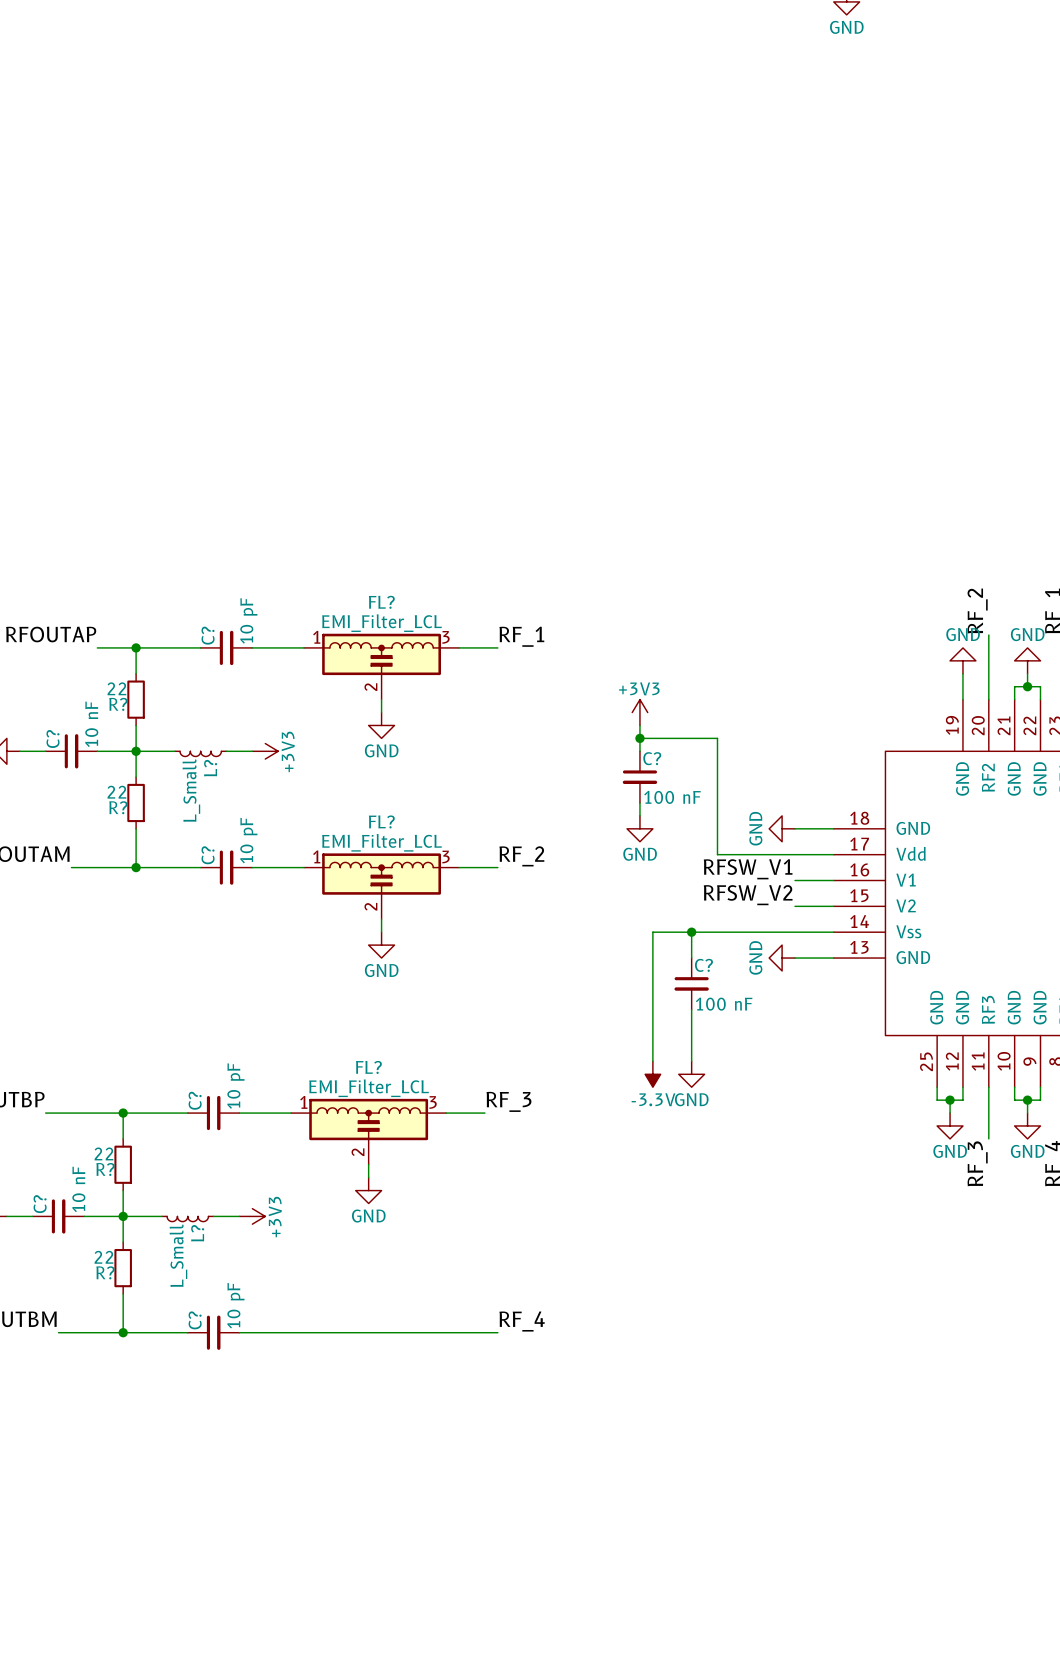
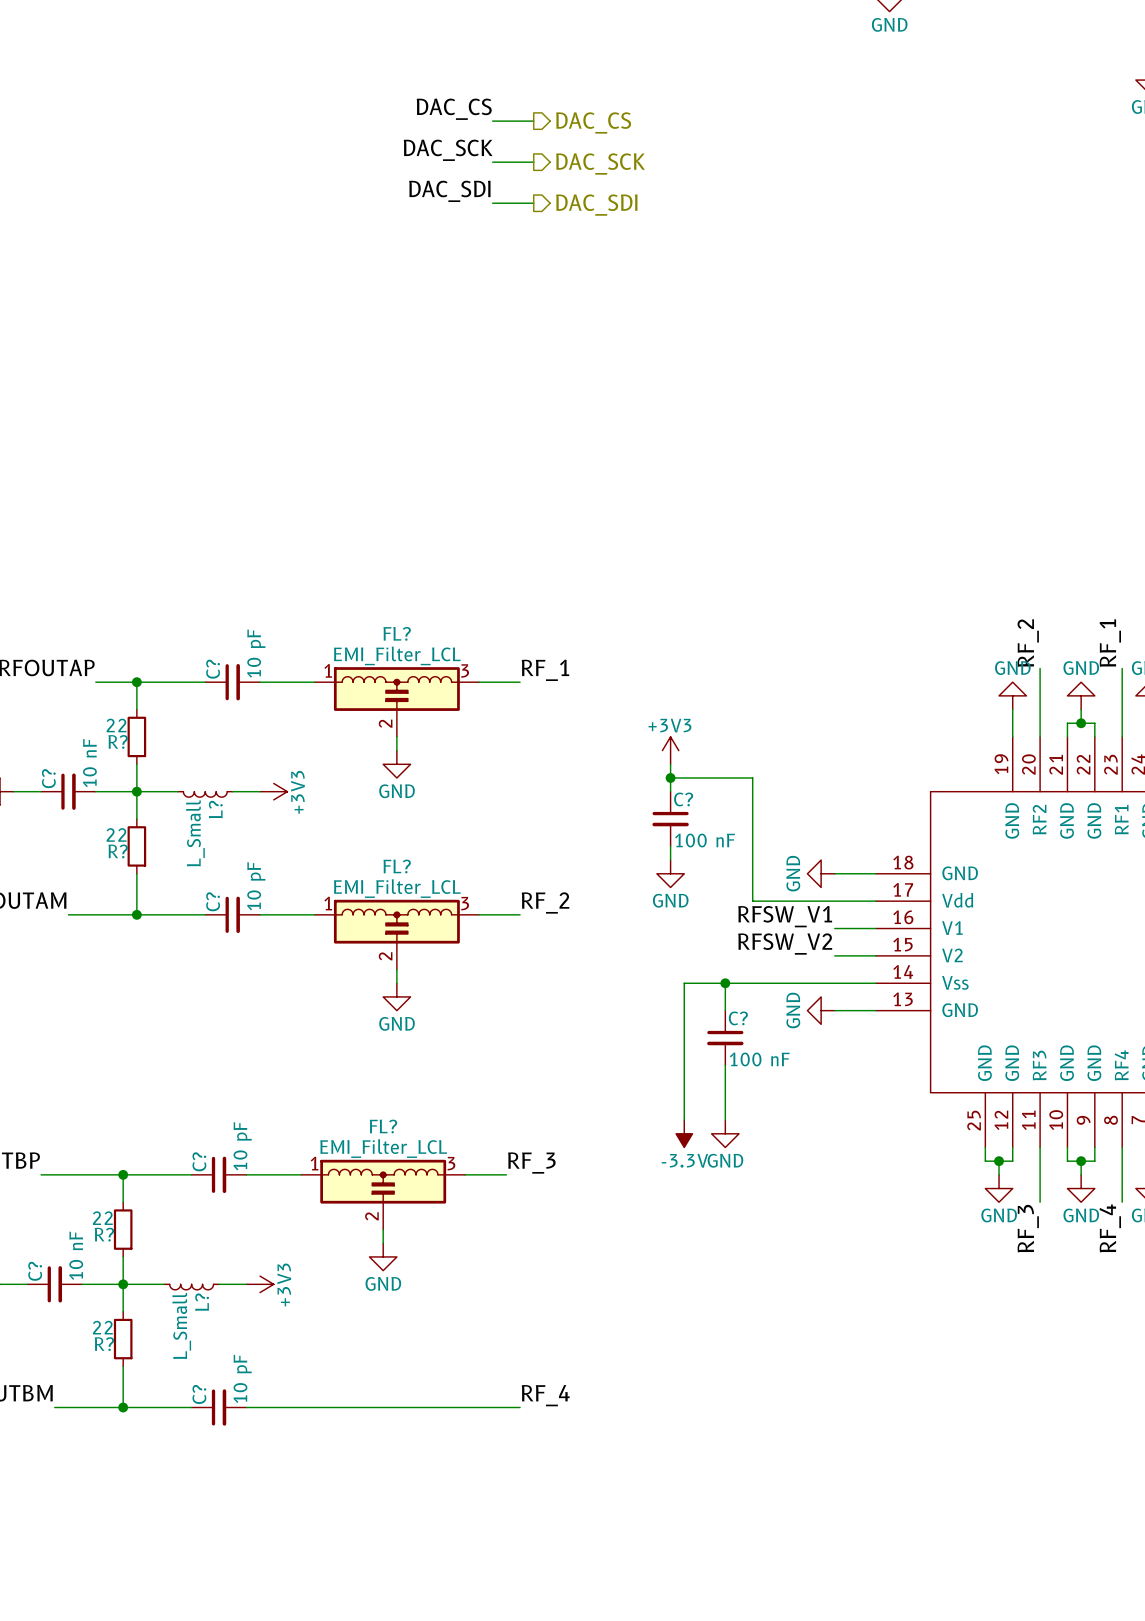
label: none -> DAC_CS (454, 109)
wire: none -> (492, 121) (533, 121)
hierarchical label: none -> DAC_CS (593, 122)
label: none -> DAC_SCK (448, 150)
wire: none -> (492, 162) (533, 162)
hierarchical label: none -> DAC_SCK (600, 164)
label: none -> DAC_SDI (449, 191)
wire: none -> (492, 203) (533, 203)
hierarchical label: none -> DAC_SDI (596, 205)

